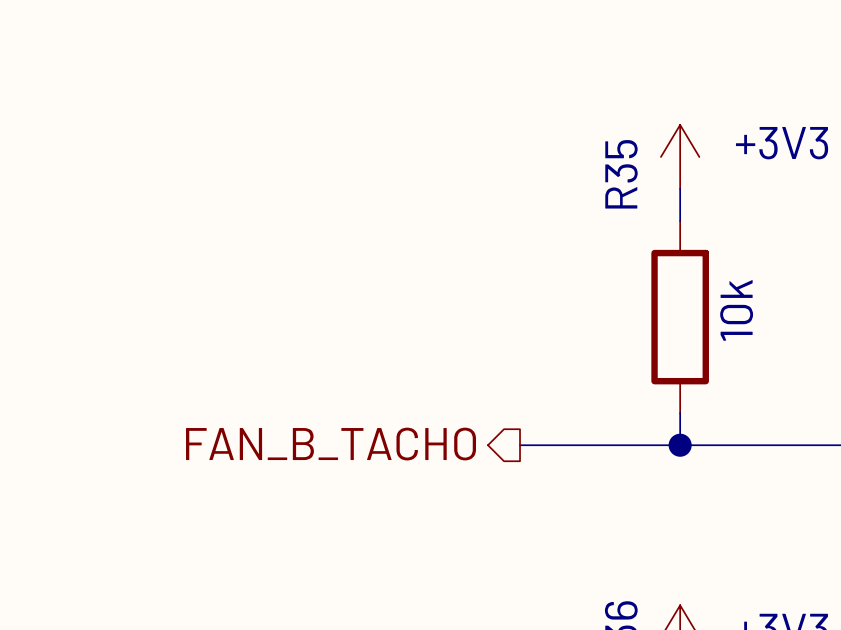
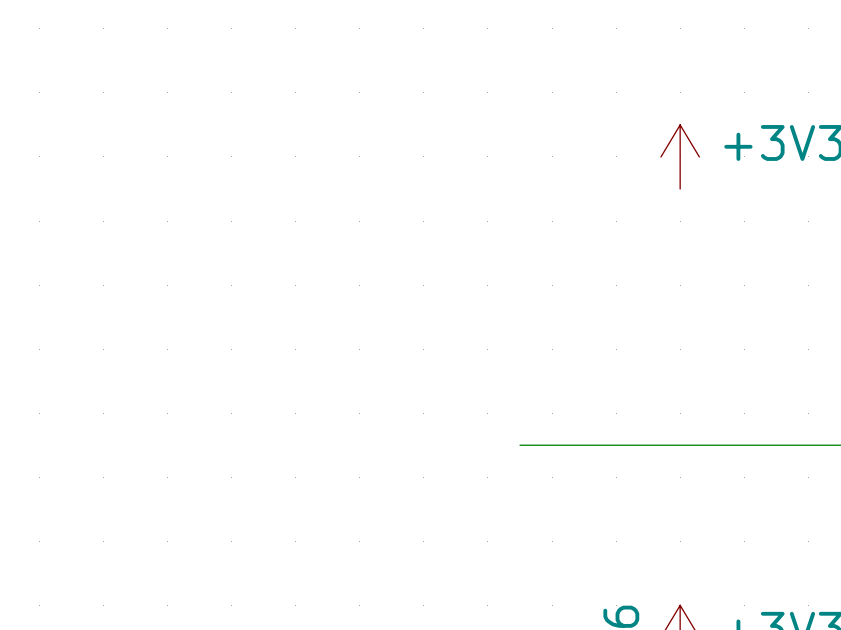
wire: (680, 189) (680, 221) -> none
R35: 10k (680, 317) -> none
wire: (680, 413) (680, 445) -> none
hierarchical label: FAN_B_TACHO (331, 444) -> none
junction: (680, 445) -> none

